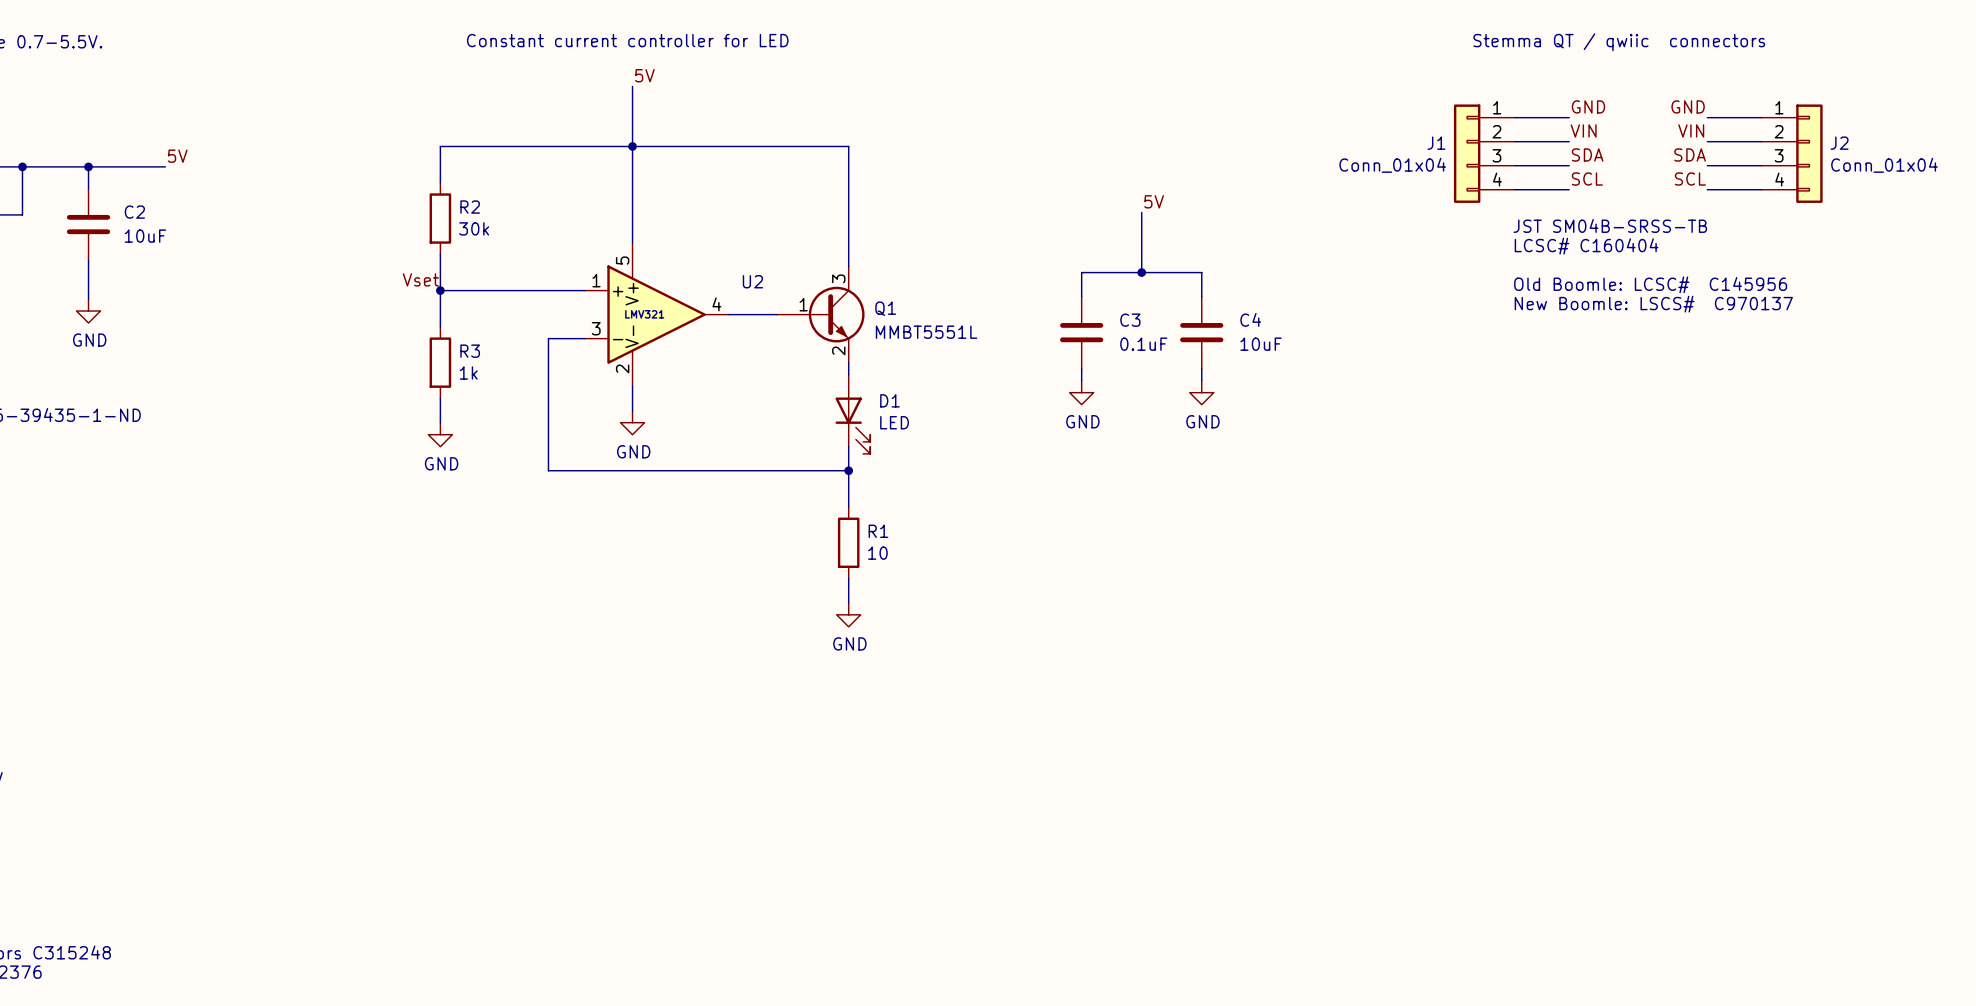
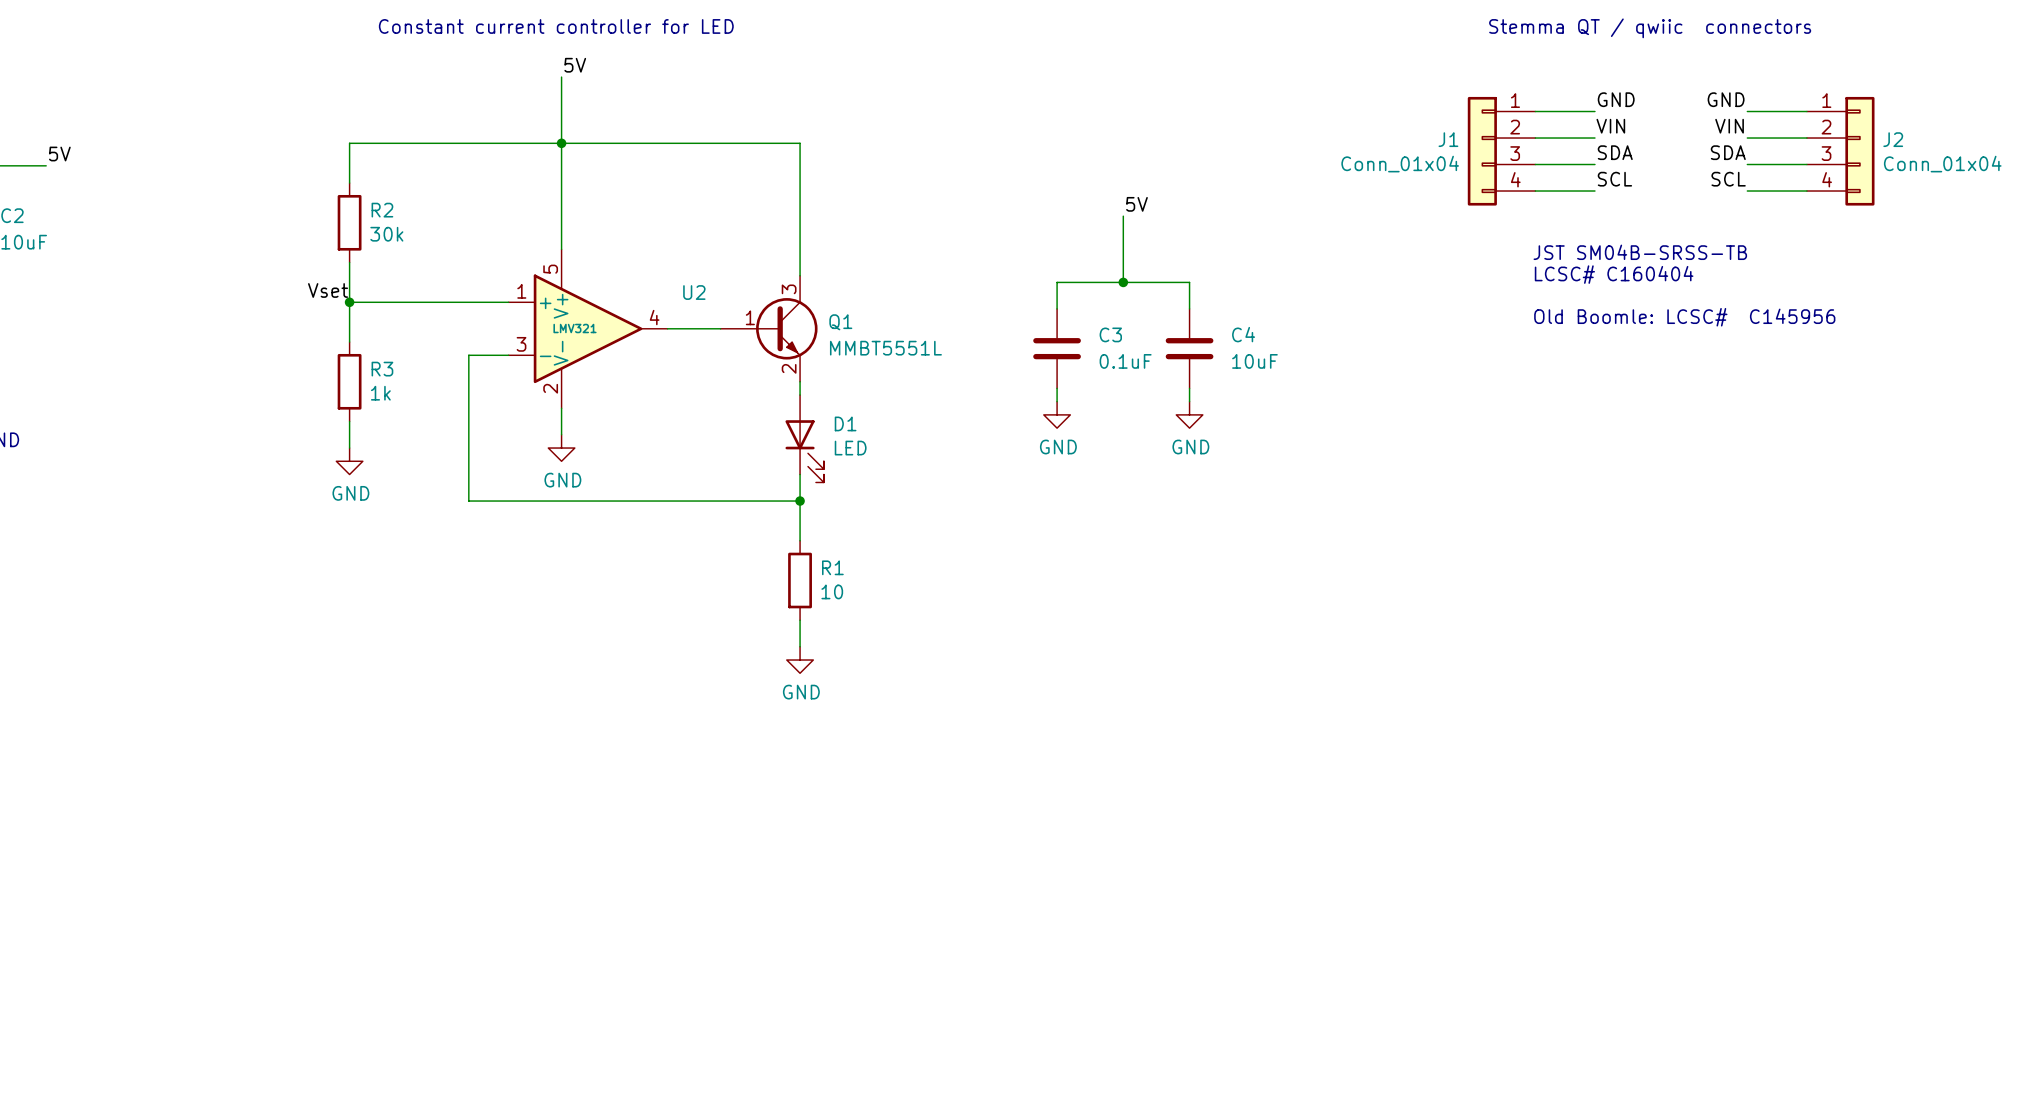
text: JST SM04B-SRSS-TB (1610, 225) -> none
text: LCSC# C160404 (1586, 246) -> JST SM04B-SRSS-TB (1640, 252)
text: none -> LCSC# C160404 (1614, 274)
text: Old Boomle: LCSC# C145956 (1650, 284) -> none
text: New Boomle: LSCS# C970137 (1653, 304) -> Old Boomle: LCSC# C145956 (1684, 317)

